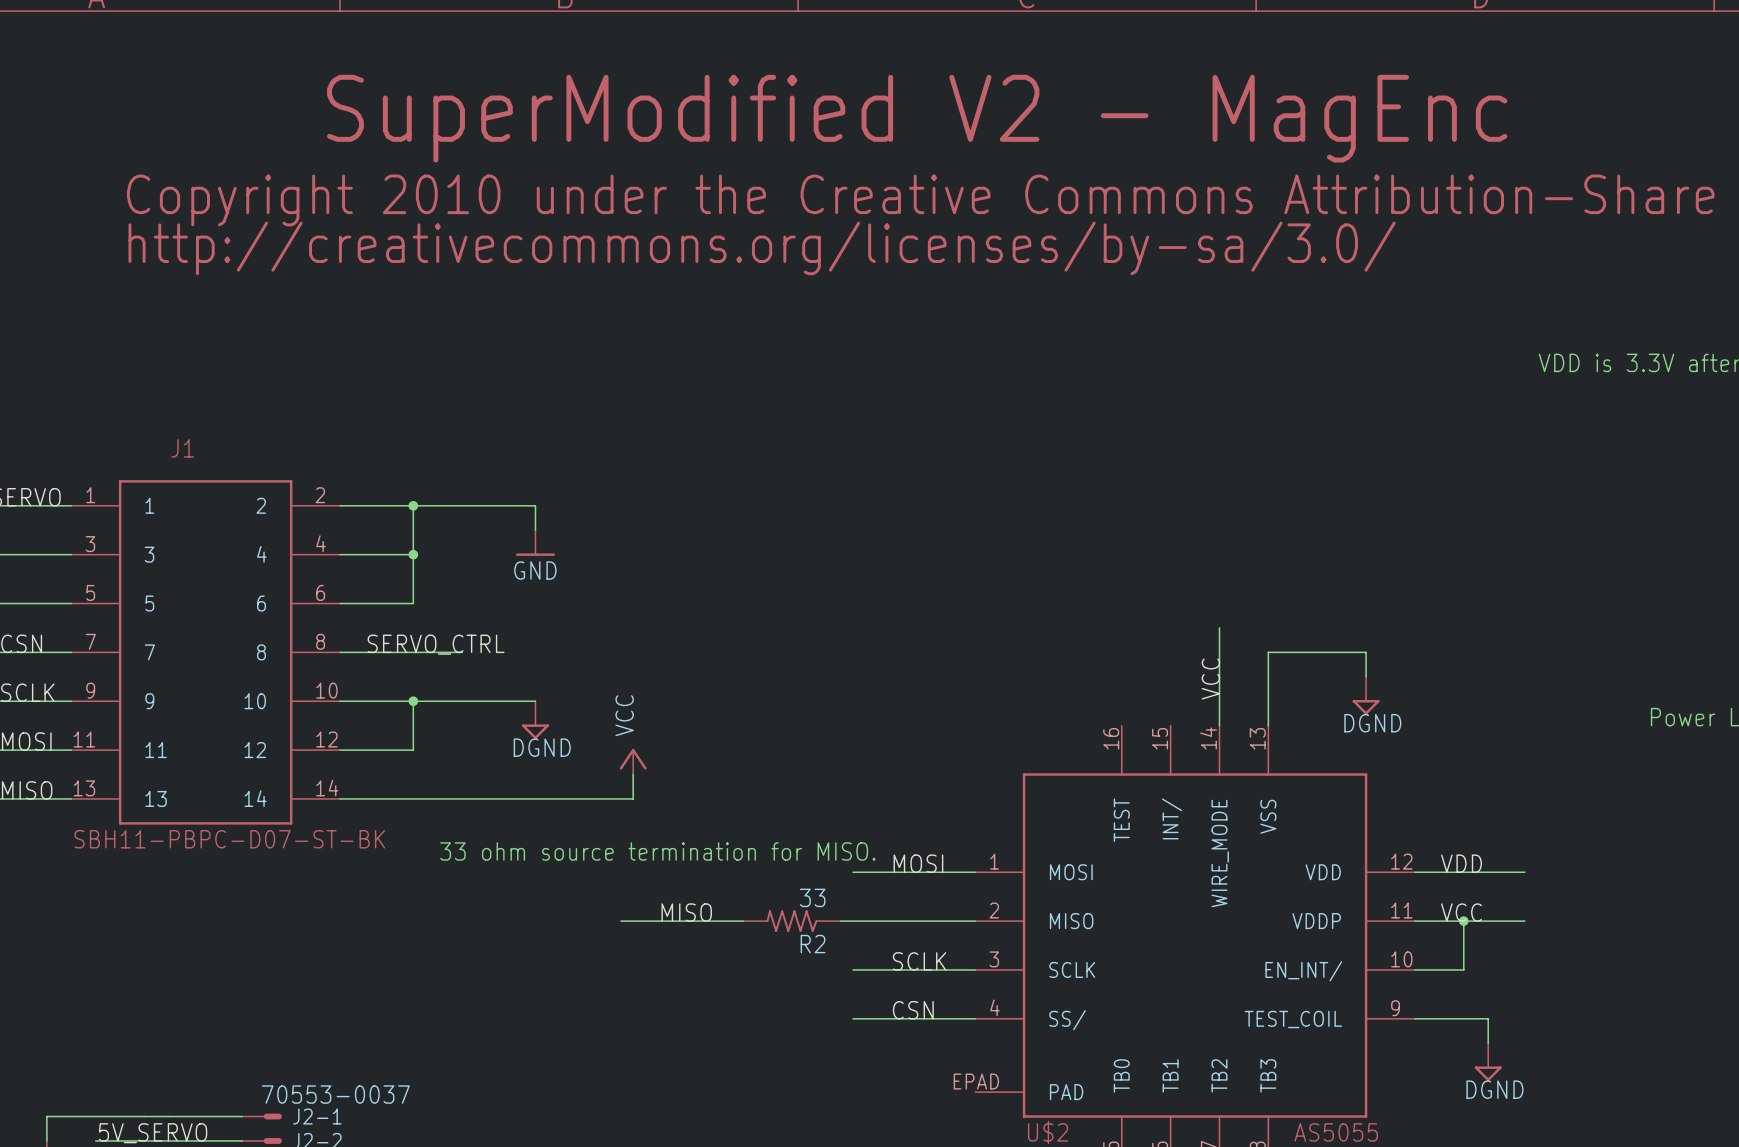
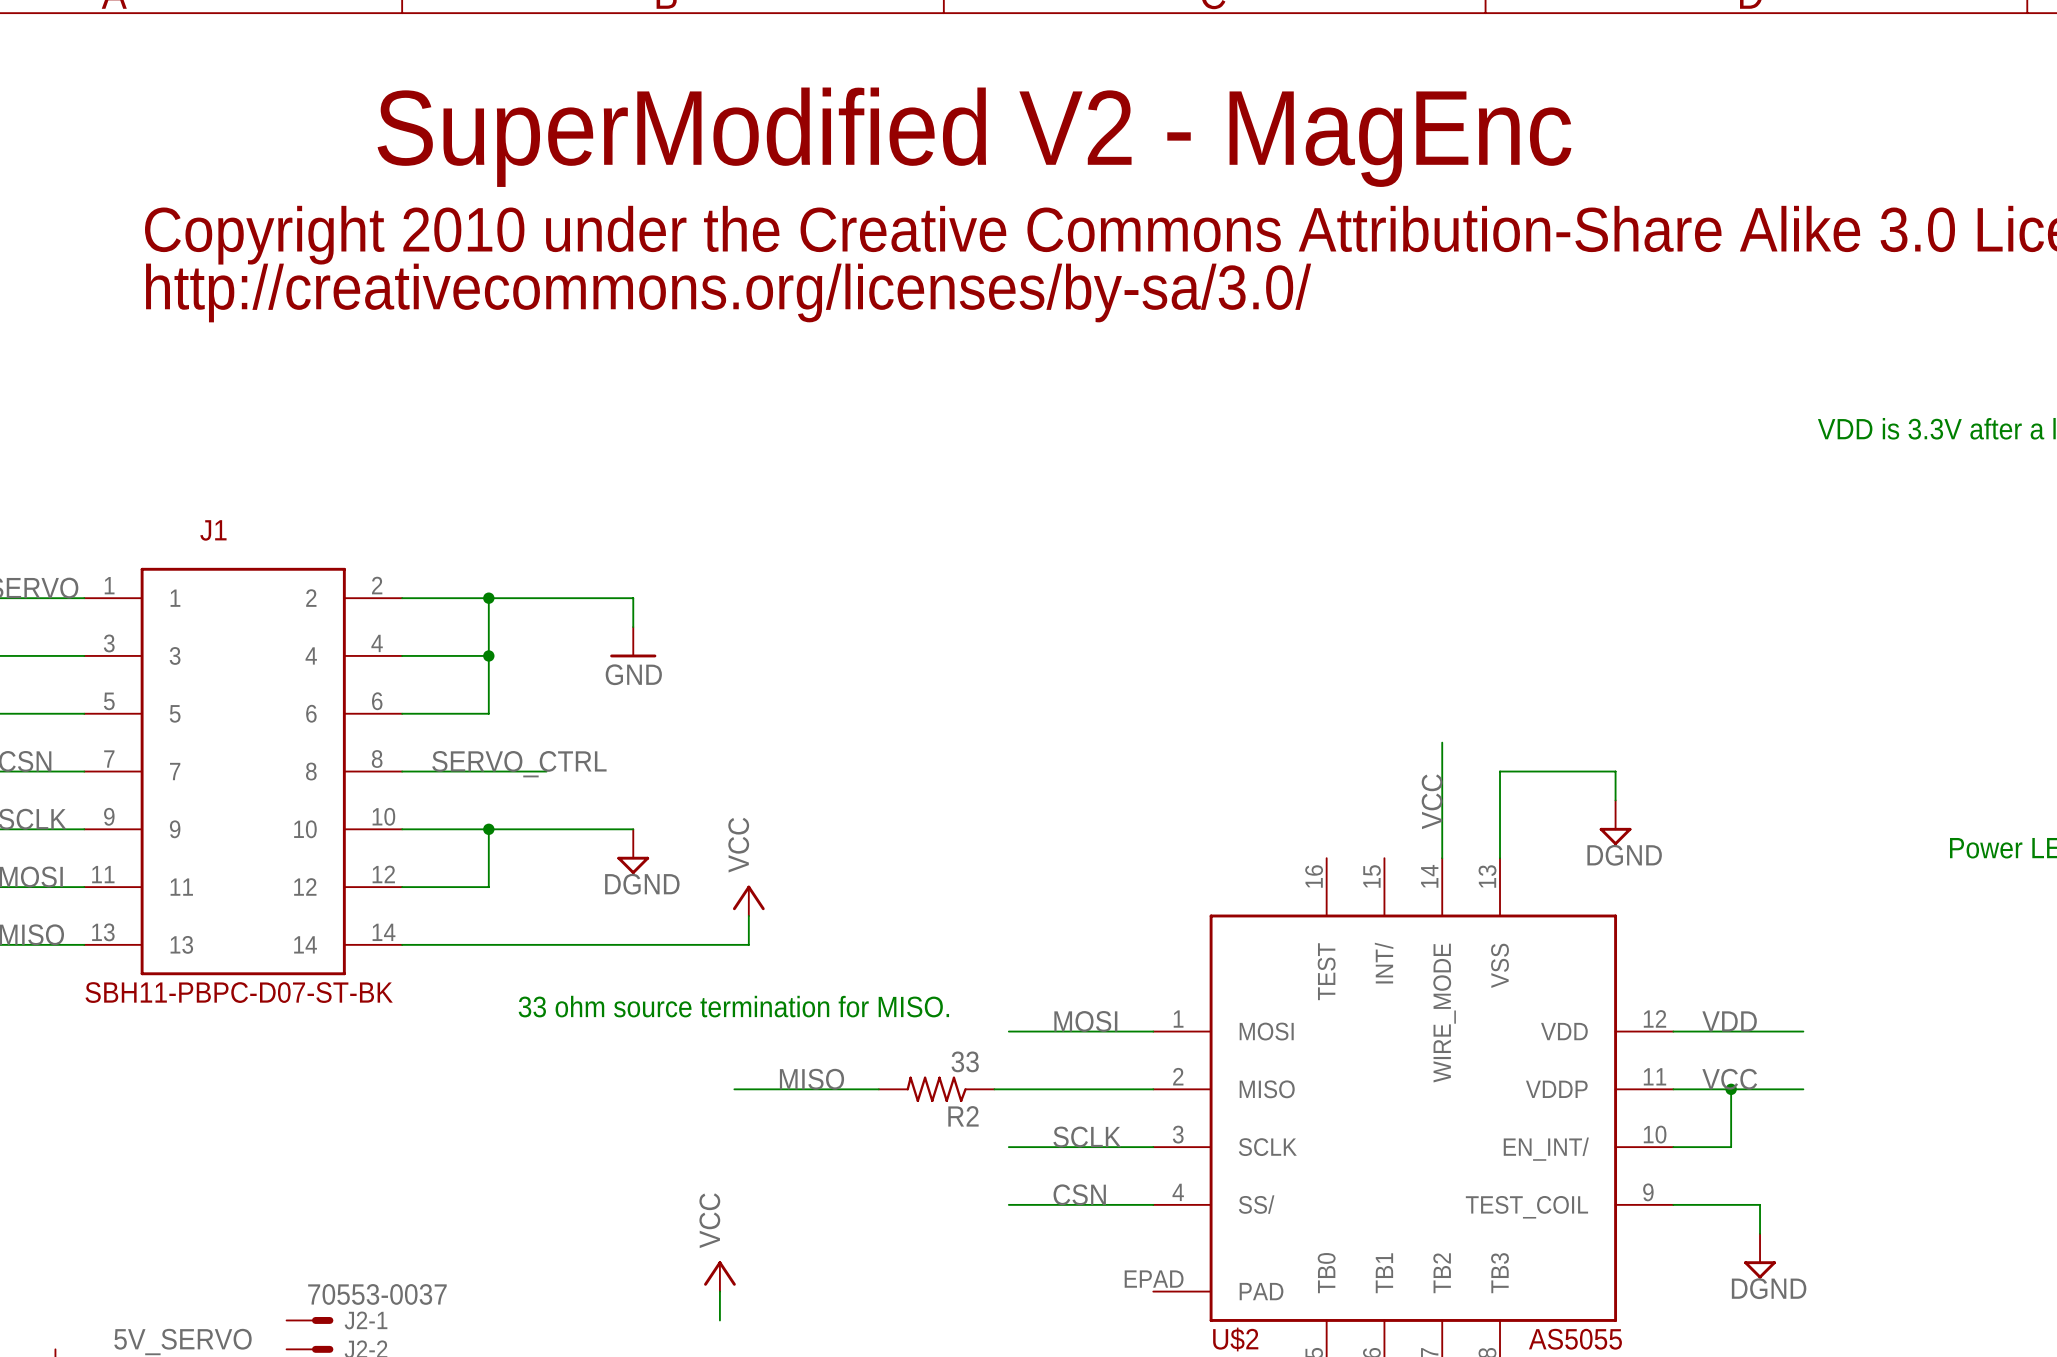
power symbol: none -> VCC (719, 1276)
wire: none -> (719, 1291) (719, 1320)
wire: (242, 1116) (46, 1116) (46, 1140) -> none
wire: (95, 1140) (242, 1140) -> none

